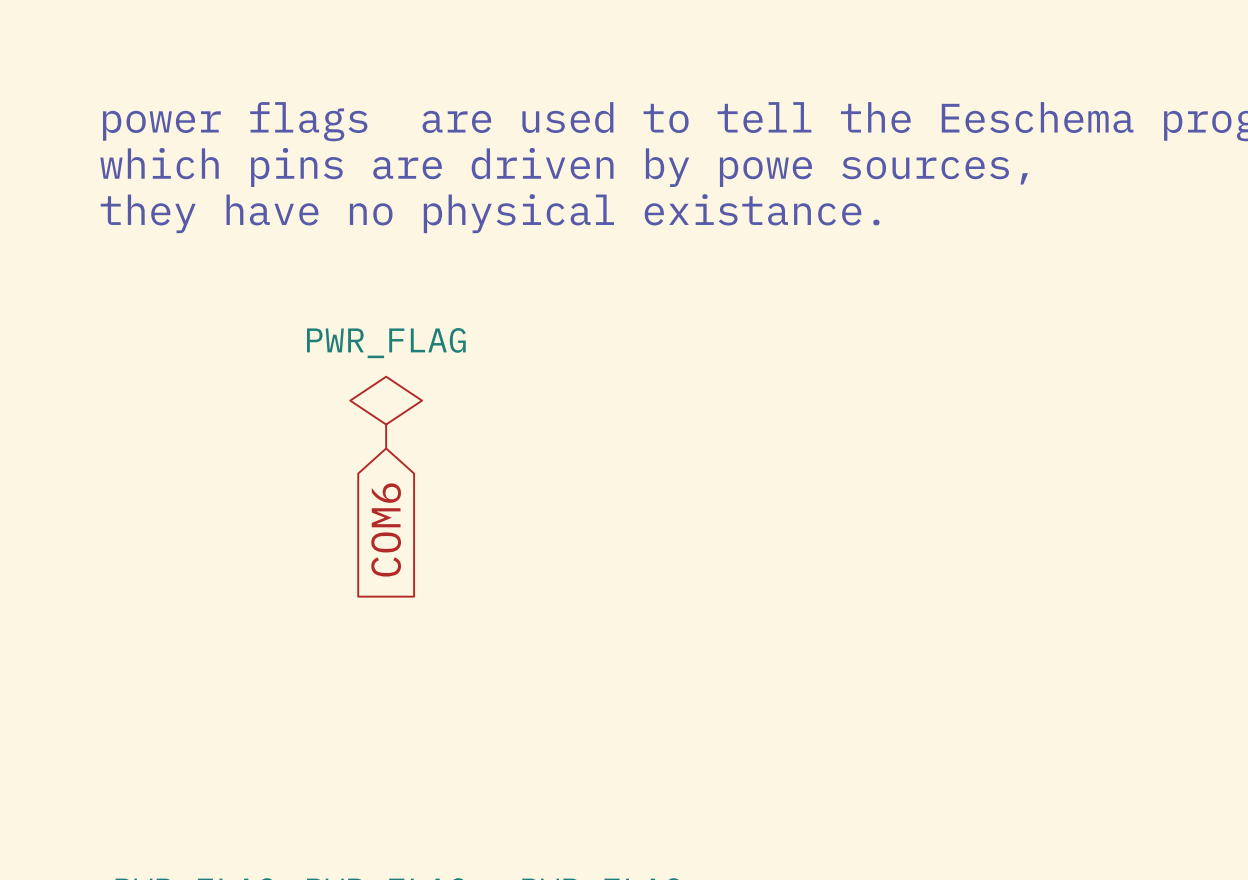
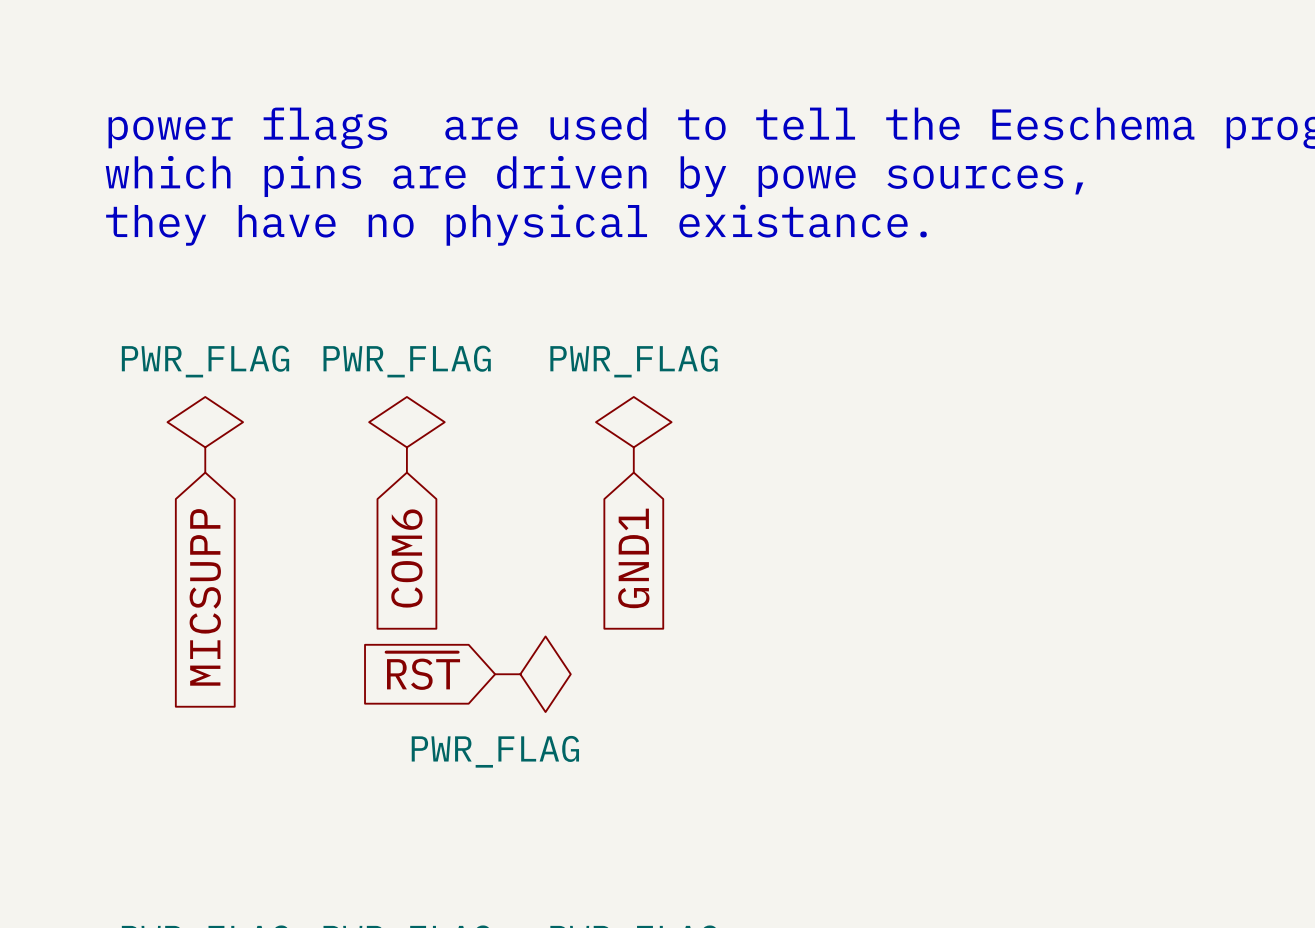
power symbol: none -> PWR_FLAG (205, 434)
power symbol: none -> PWR_FLAG (633, 434)
global label: none -> GND1 (633, 558)
global label: none -> MICSUPP (205, 597)
global label: none -> ~{RST} (423, 671)
power symbol: none -> PWR_FLAG (532, 674)

